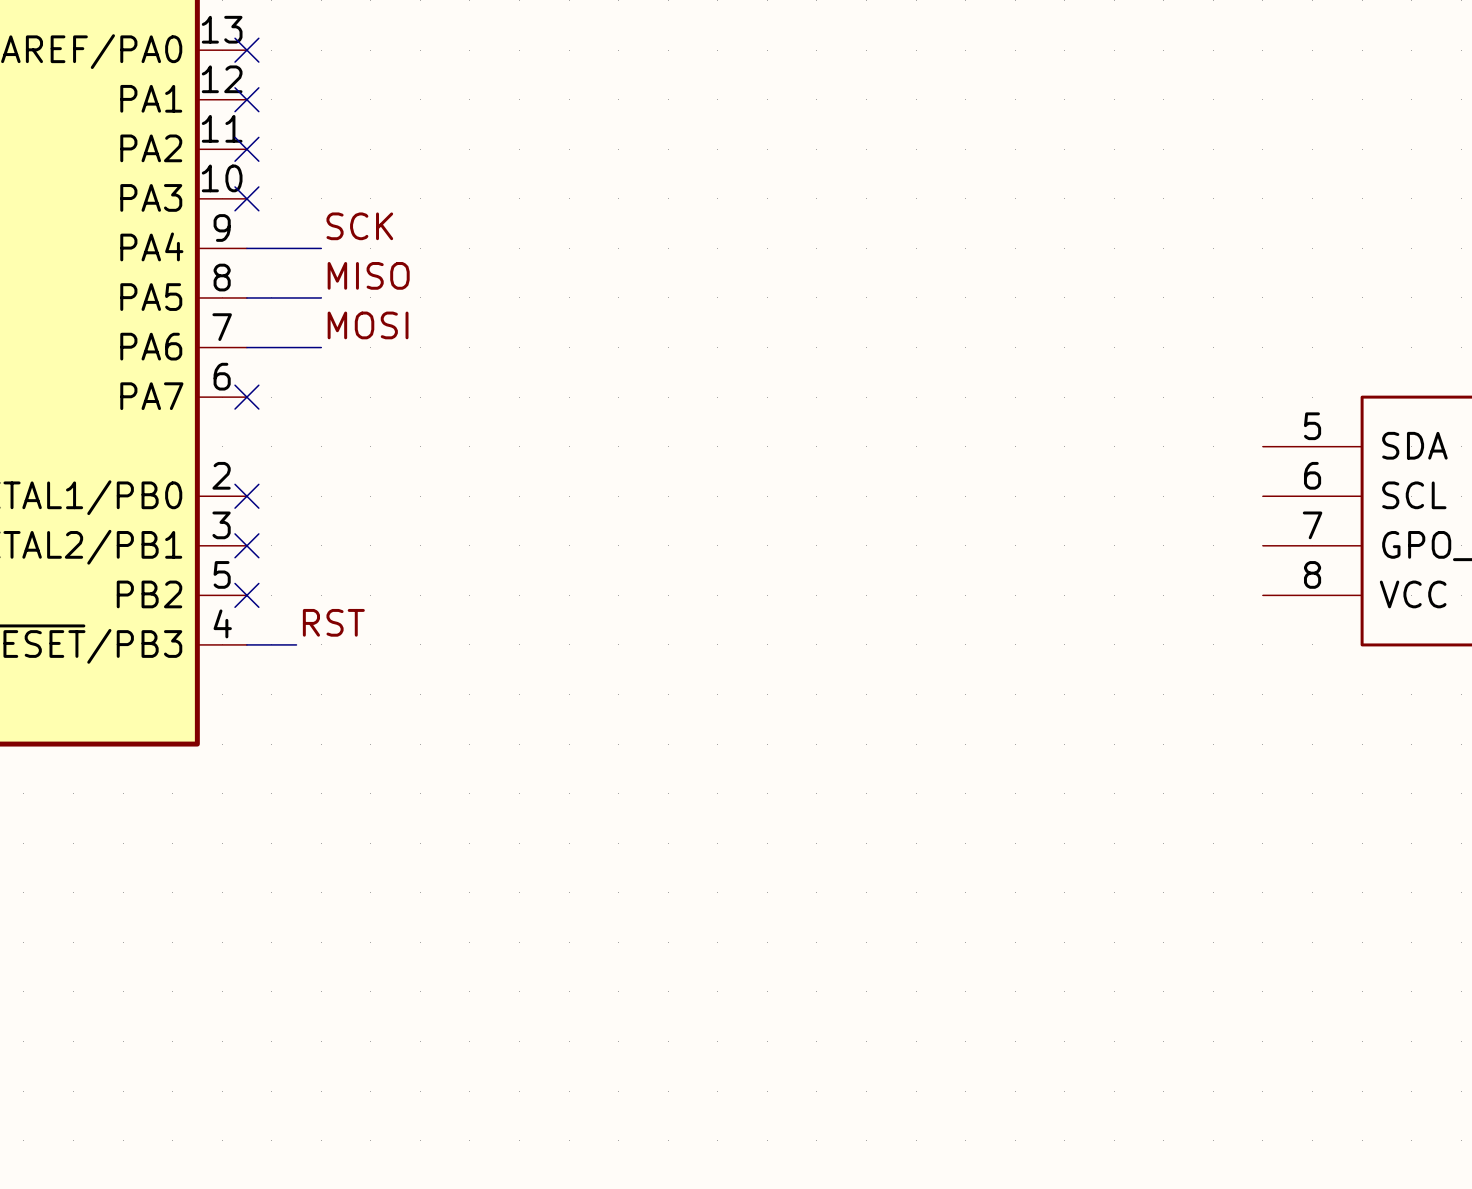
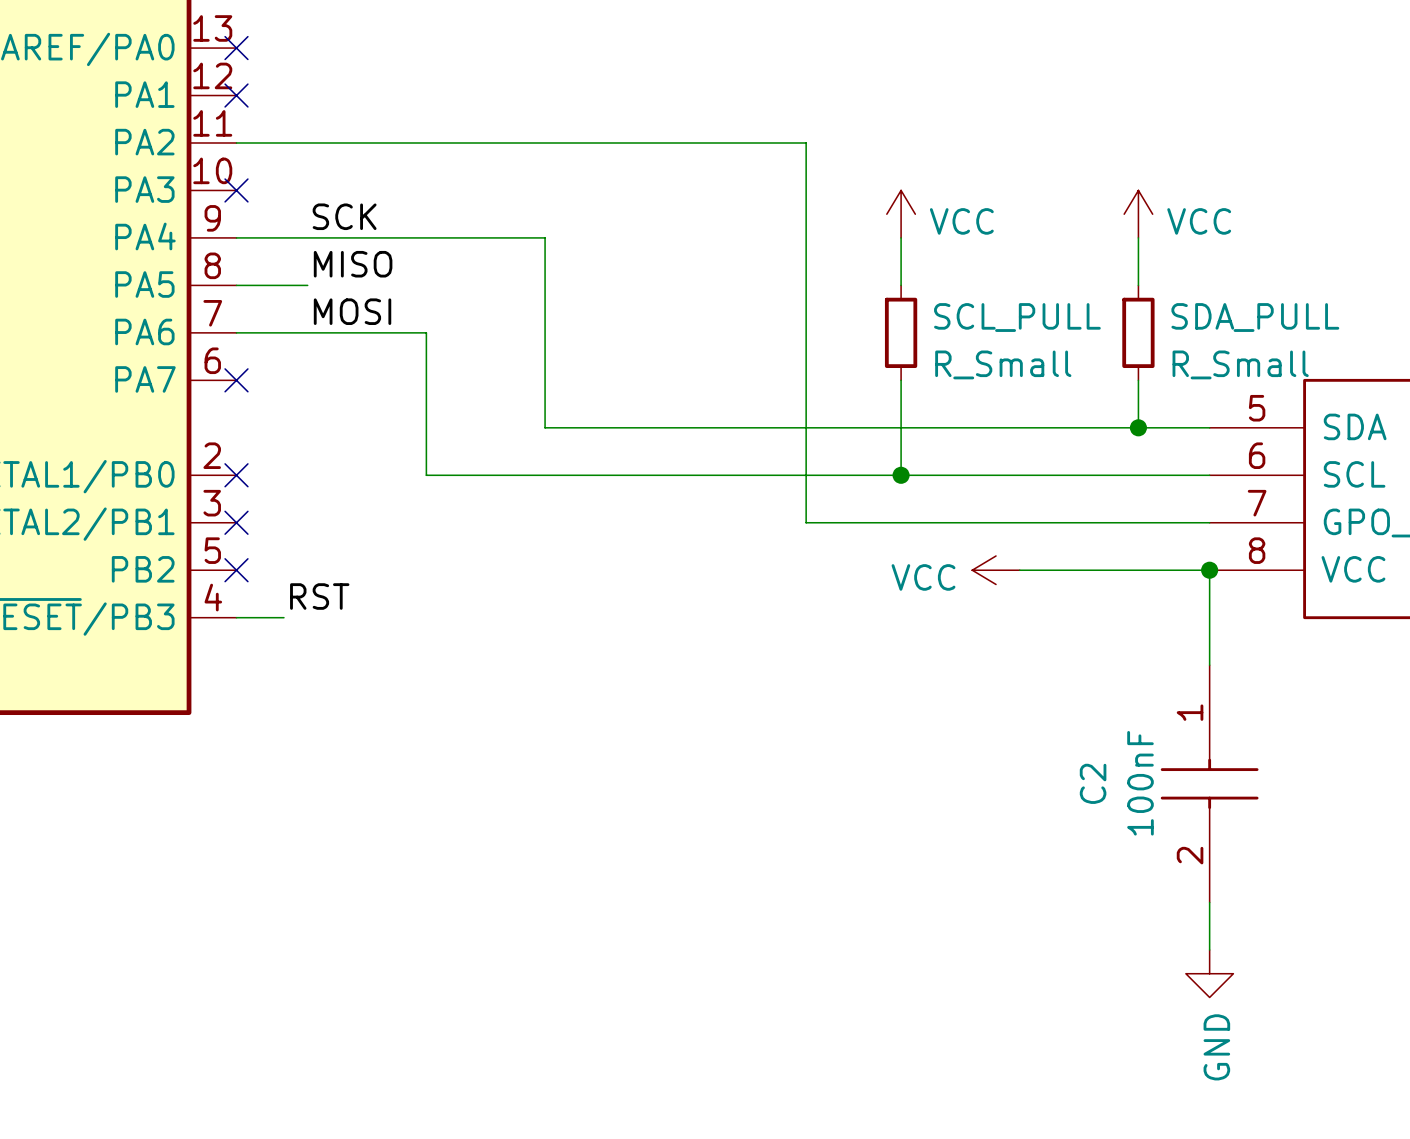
wire: none -> (236, 142) (806, 142) (806, 522) (1209, 522)
no-connect mark: (246, 149) -> none
power symbol: none -> VCC (901, 214)
power symbol: none -> VCC (1138, 214)
wire: none -> (307, 237) (545, 237) (545, 427) (1209, 427)
wire: none -> (901, 237) (901, 285)
wire: none -> (1138, 237) (1138, 285)
wire: none -> (307, 332) (426, 332) (426, 475) (1209, 475)
SCL_PULL: none -> R_Small (901, 332)
SDA_PULL: none -> R_Small (1138, 332)
wire: none -> (901, 380) (901, 475)
wire: none -> (1138, 380) (1138, 427)
junction: none -> (1138, 427)
junction: none -> (901, 475)
power symbol: none -> VCC (996, 570)
wire: none -> (1019, 570) (1209, 570) (1209, 665)
junction: none -> (1209, 570)
C2: none -> 100nF (1209, 783)
wire: none -> (1209, 902) (1209, 949)
power symbol: none -> GND (1209, 973)

